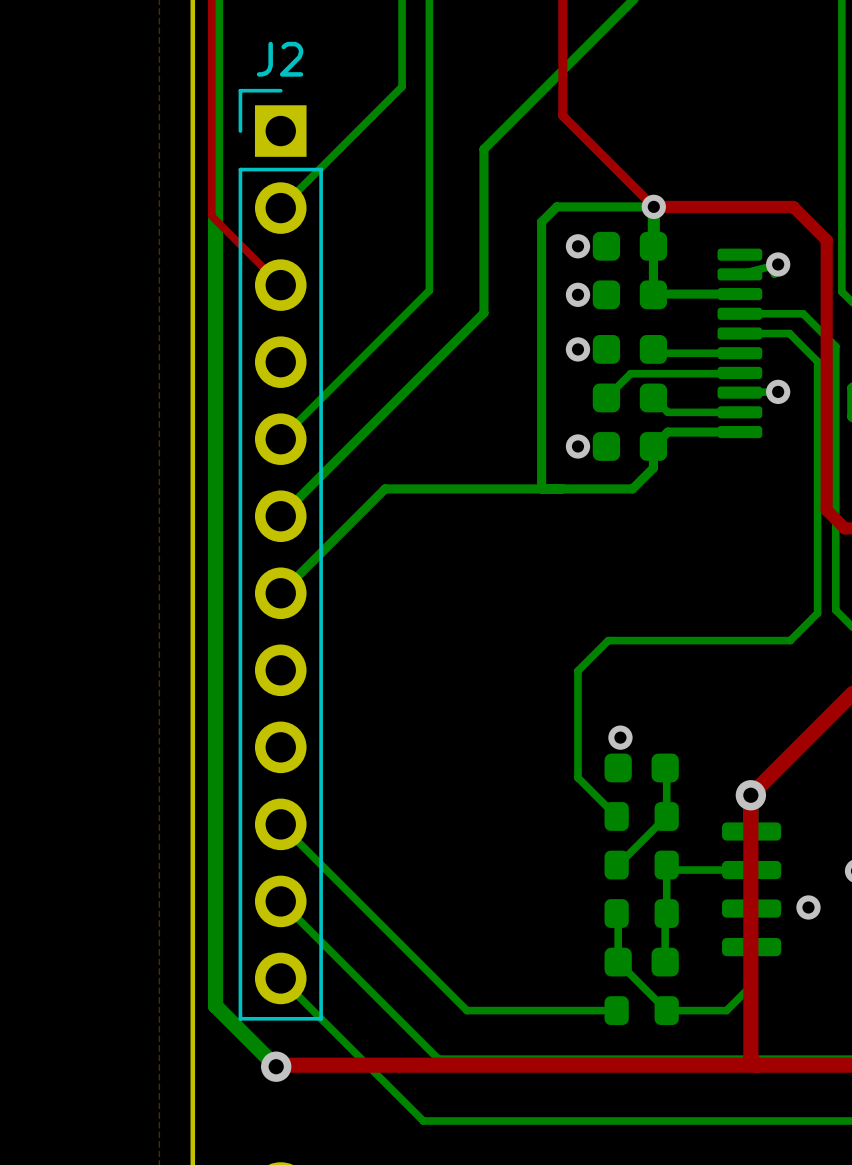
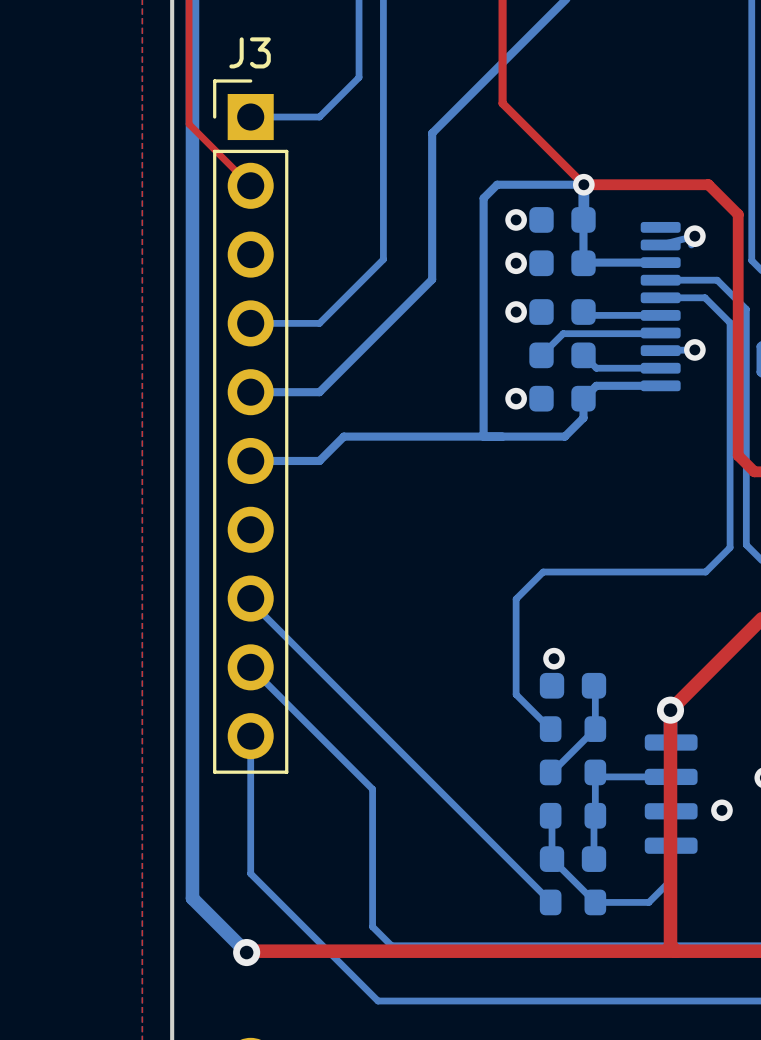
bottom track: (357, 131) (280, 208) -> (319, 117) (250, 117)
top track: (211, 139) (211, 216) (280, 285) -> (189, 124) (250, 185)
bottom track: (357, 362) (280, 439) -> (319, 323) (250, 323)
bottom track: (357, 439) (280, 516) -> (319, 392) (250, 392)
J3: none -> (250, 426)
bottom track: (357, 516) (280, 593) -> (319, 460) (250, 460)
J2: (280, 554) -> none
bottom track: (280, 824) (466, 1010) (616, 1010) -> (250, 598) (250, 601) (550, 902)
bottom track: none -> (250, 736) (250, 873)
bottom track: (280, 901) (417, 1037) -> (250, 667) (372, 789) (372, 926)

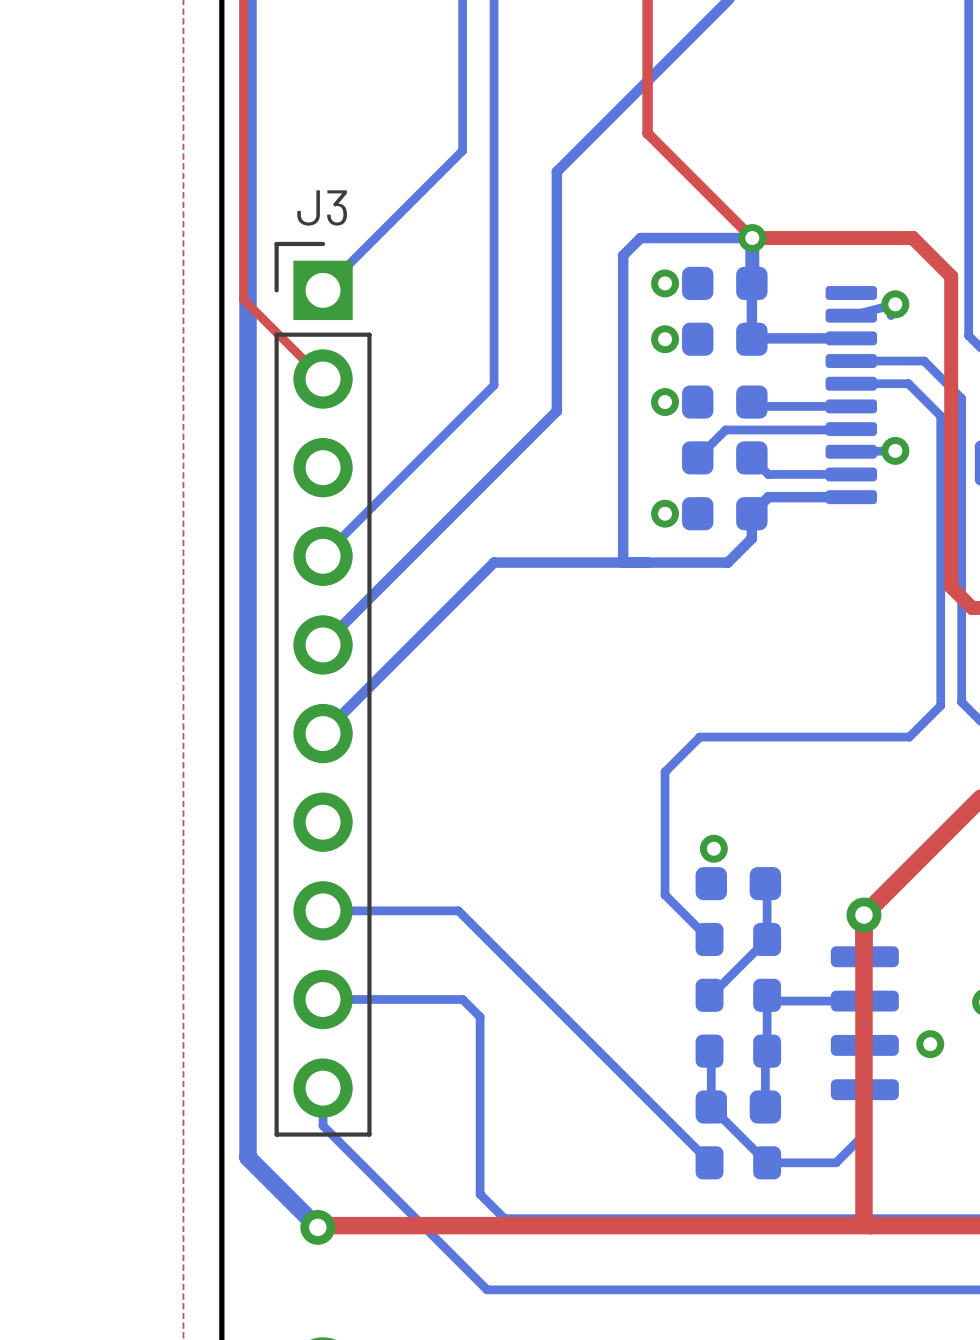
bottom track: (359, 77) (319, 117) (250, 117) -> (462, 99) (462, 150) (323, 290)
top track: (189, 124) (250, 185) -> (243, 160) (243, 299) (323, 379)
bottom track: (383, 259) (319, 323) (250, 323) -> (494, 334) (494, 385) (323, 556)
bottom track: (432, 279) (319, 392) (250, 392) -> (556, 360) (556, 411) (323, 644)
J3 position: (250, 426) -> (323, 689)
bottom track: (383, 436) (343, 436) (319, 460) (250, 460) -> (494, 562) (323, 733)
bottom track: (250, 598) (250, 601) (355, 706) -> (323, 910) (458, 910)
bottom track: (250, 667) (359, 775) -> (323, 999) (462, 999)
bottom track: (250, 736) (250, 844) -> none

